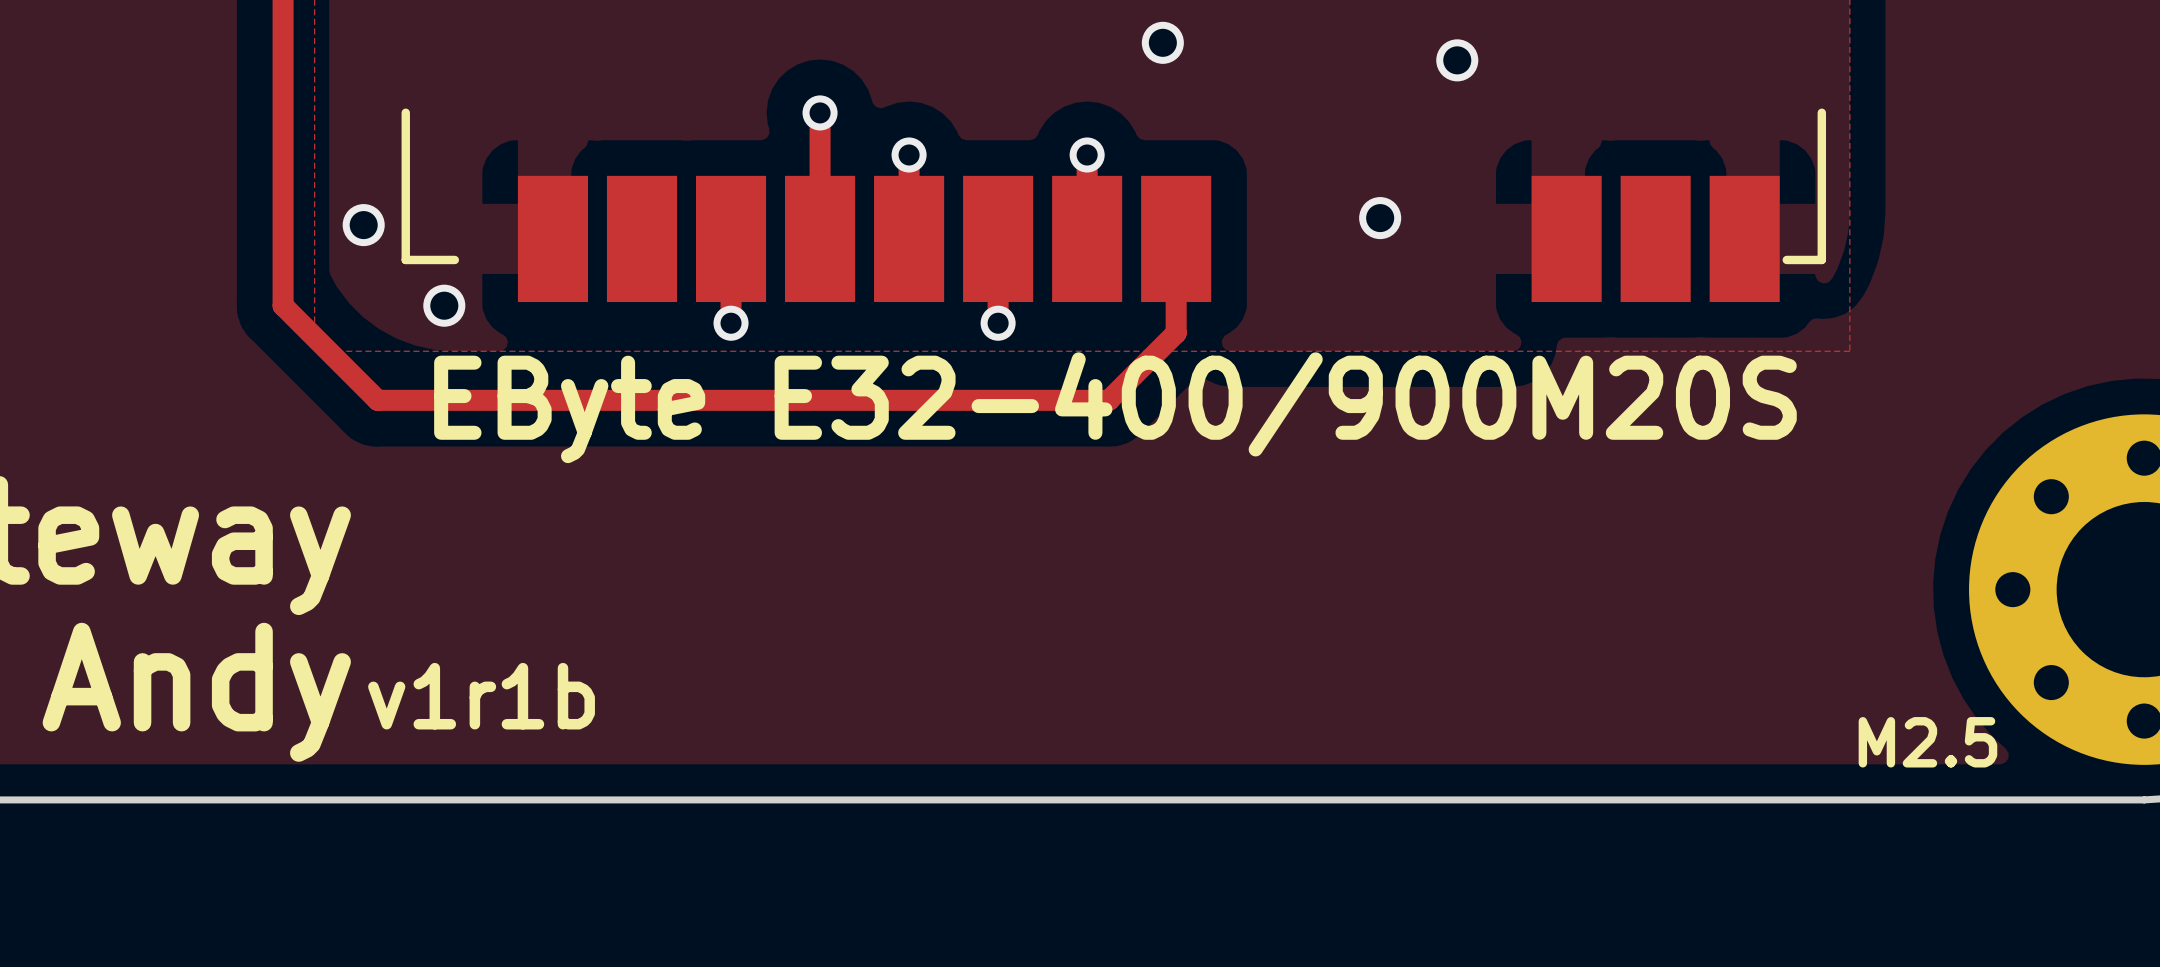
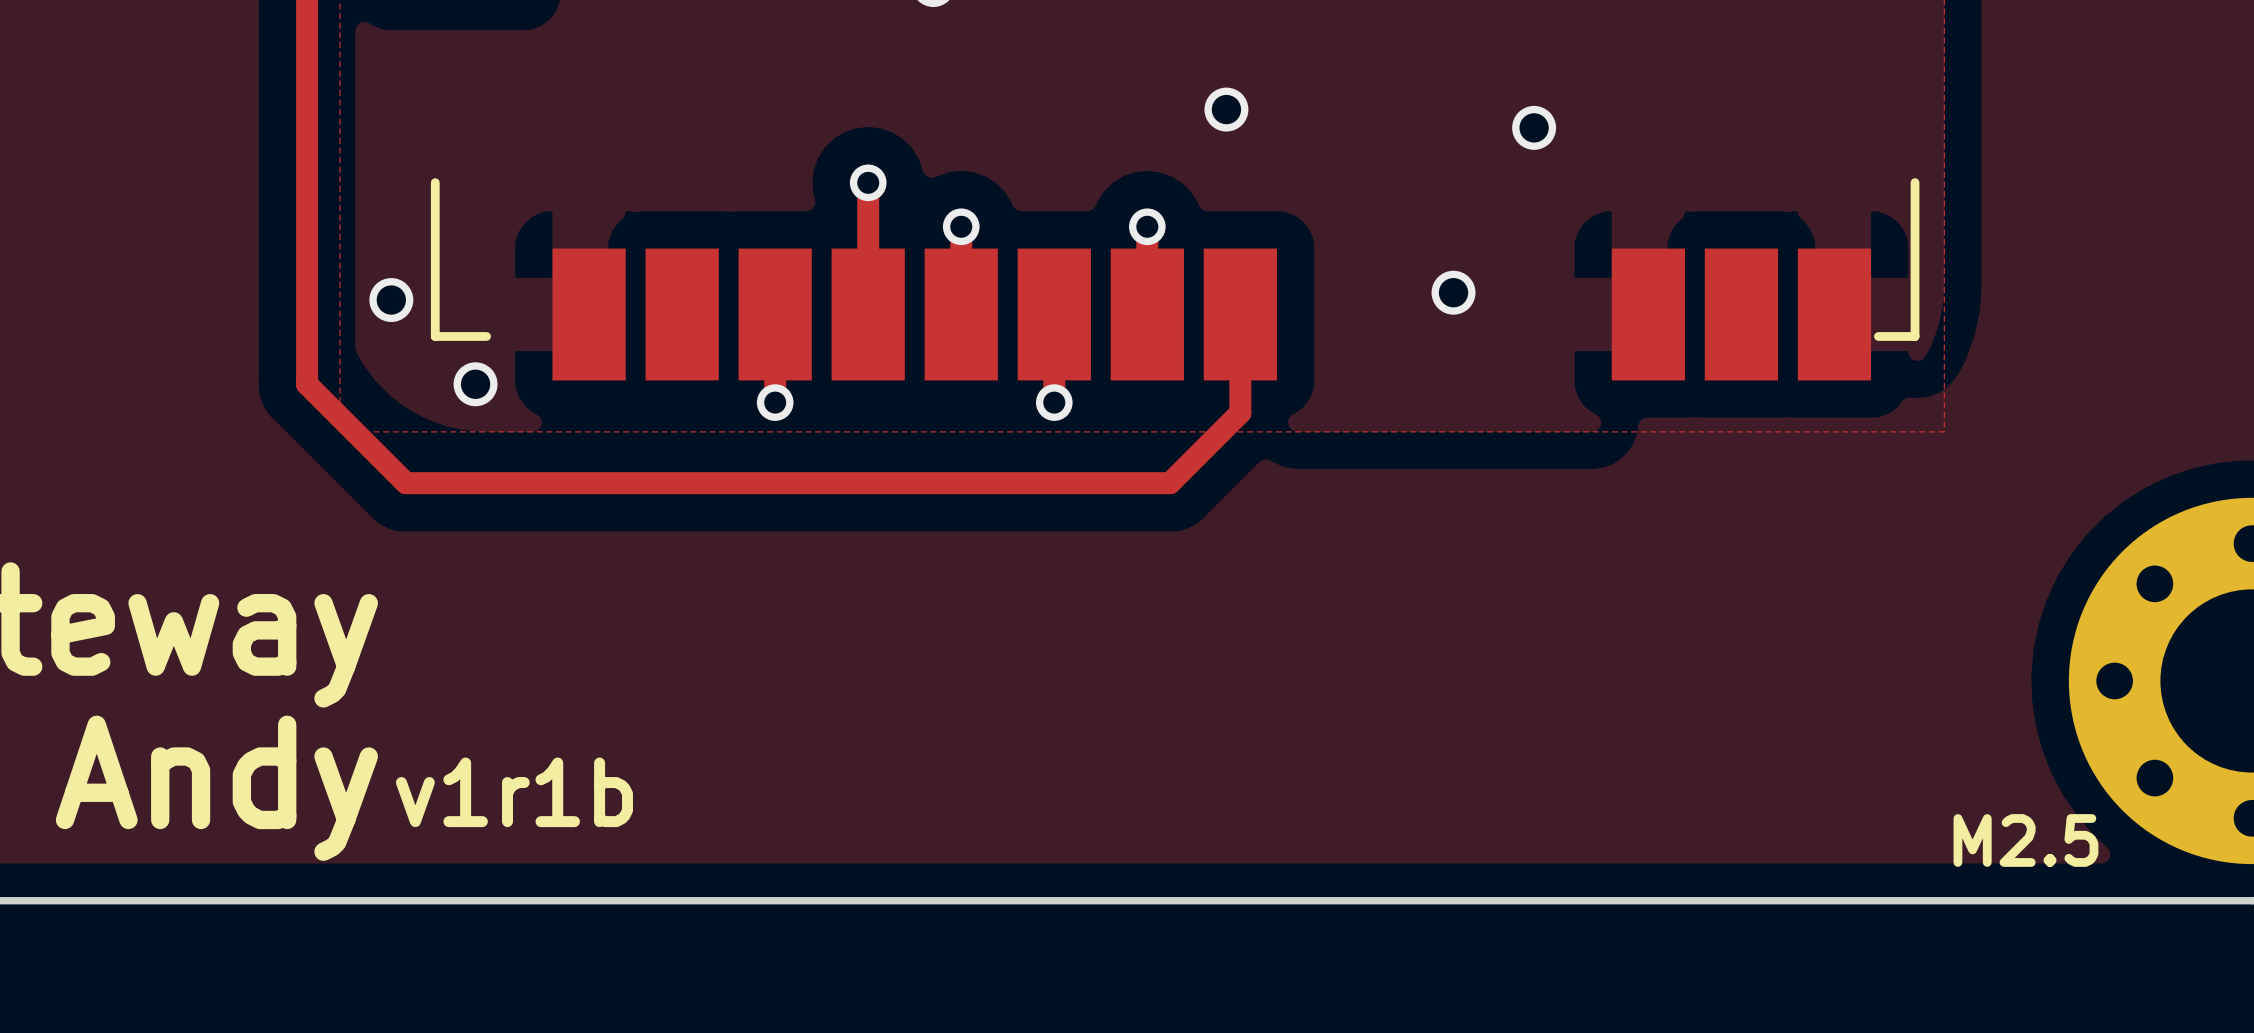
part value: EByte E32-400/900M20S (1115, 407) -> none

